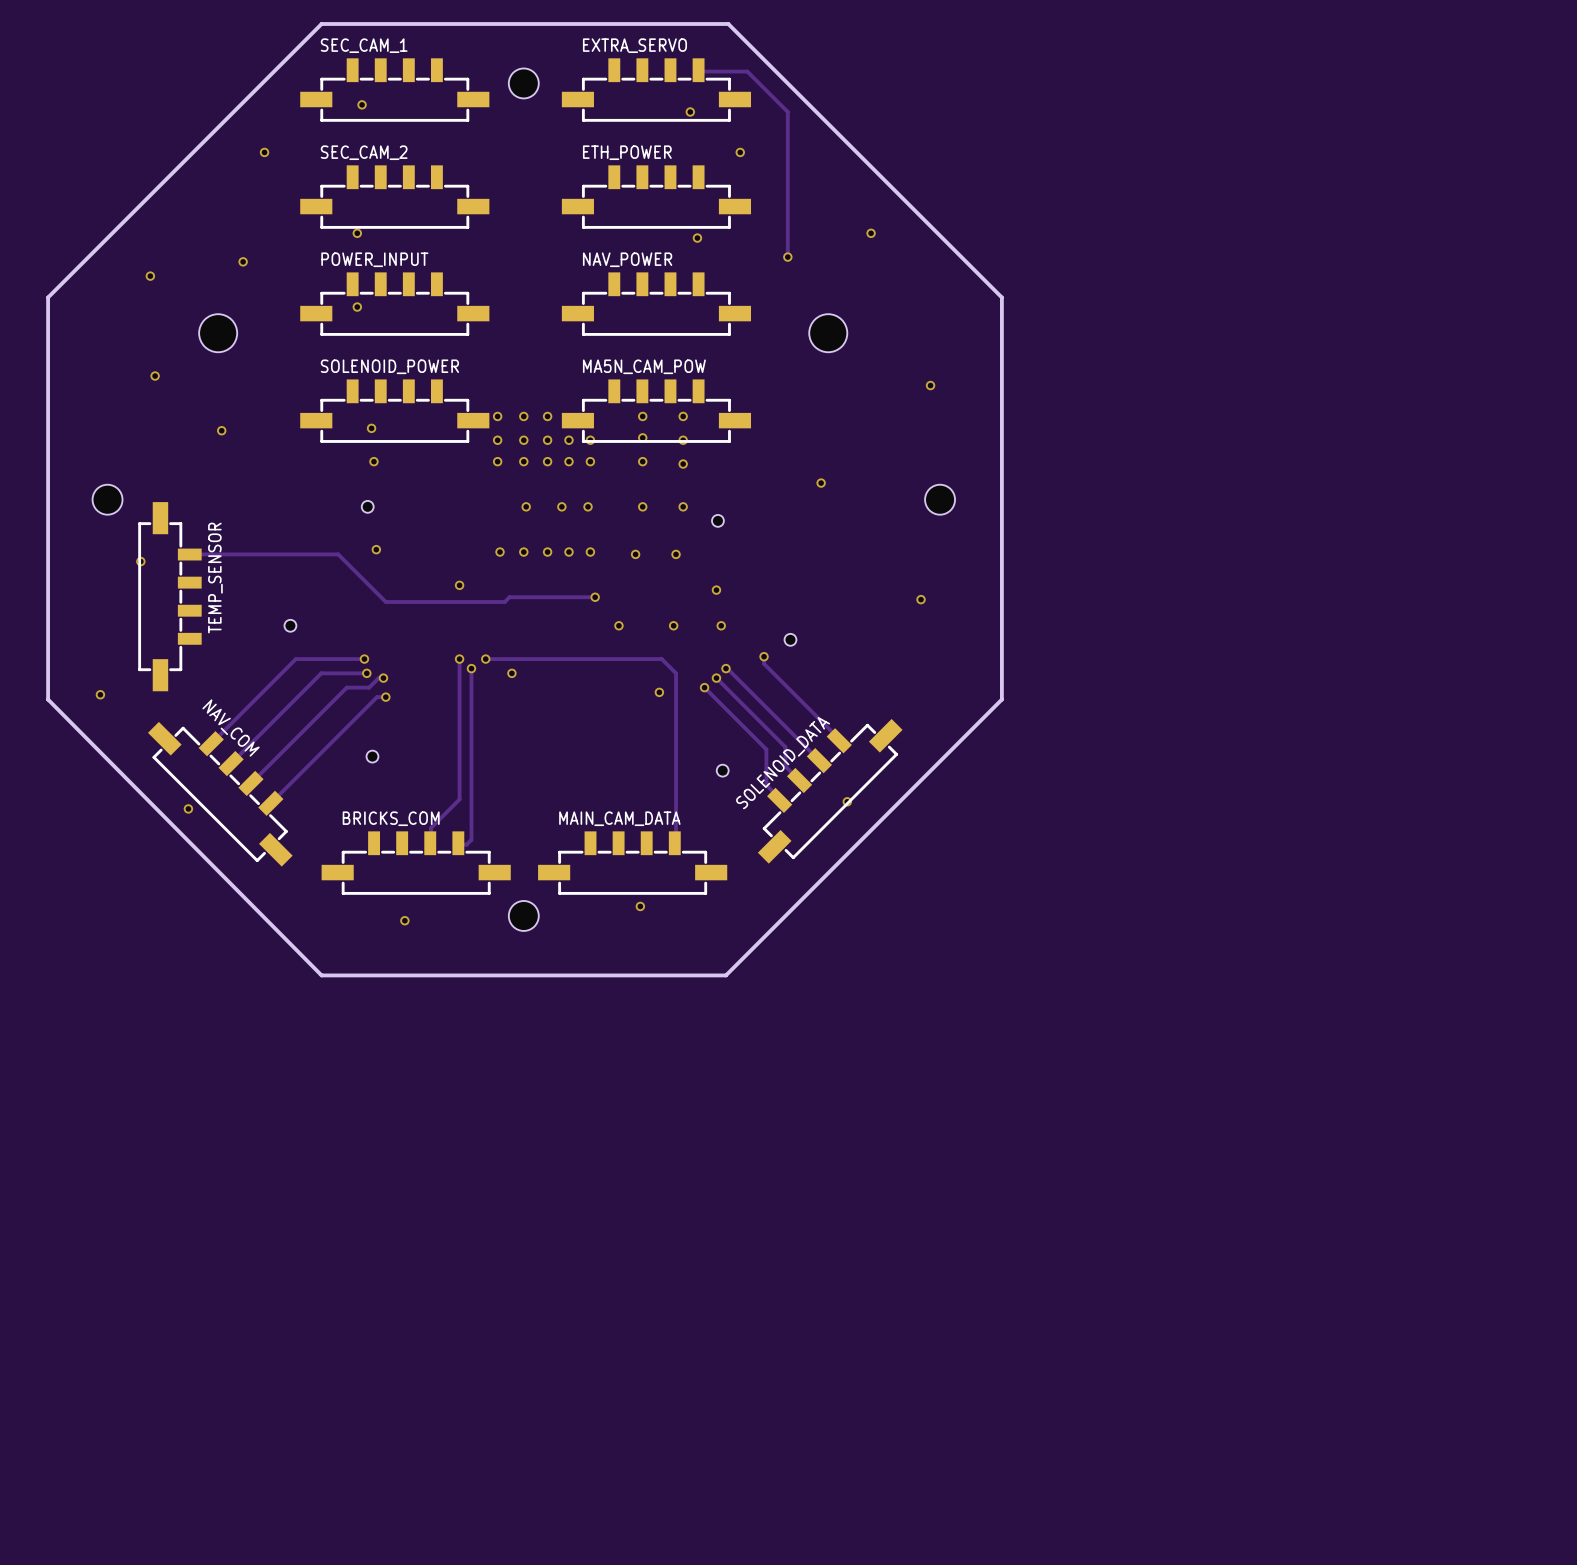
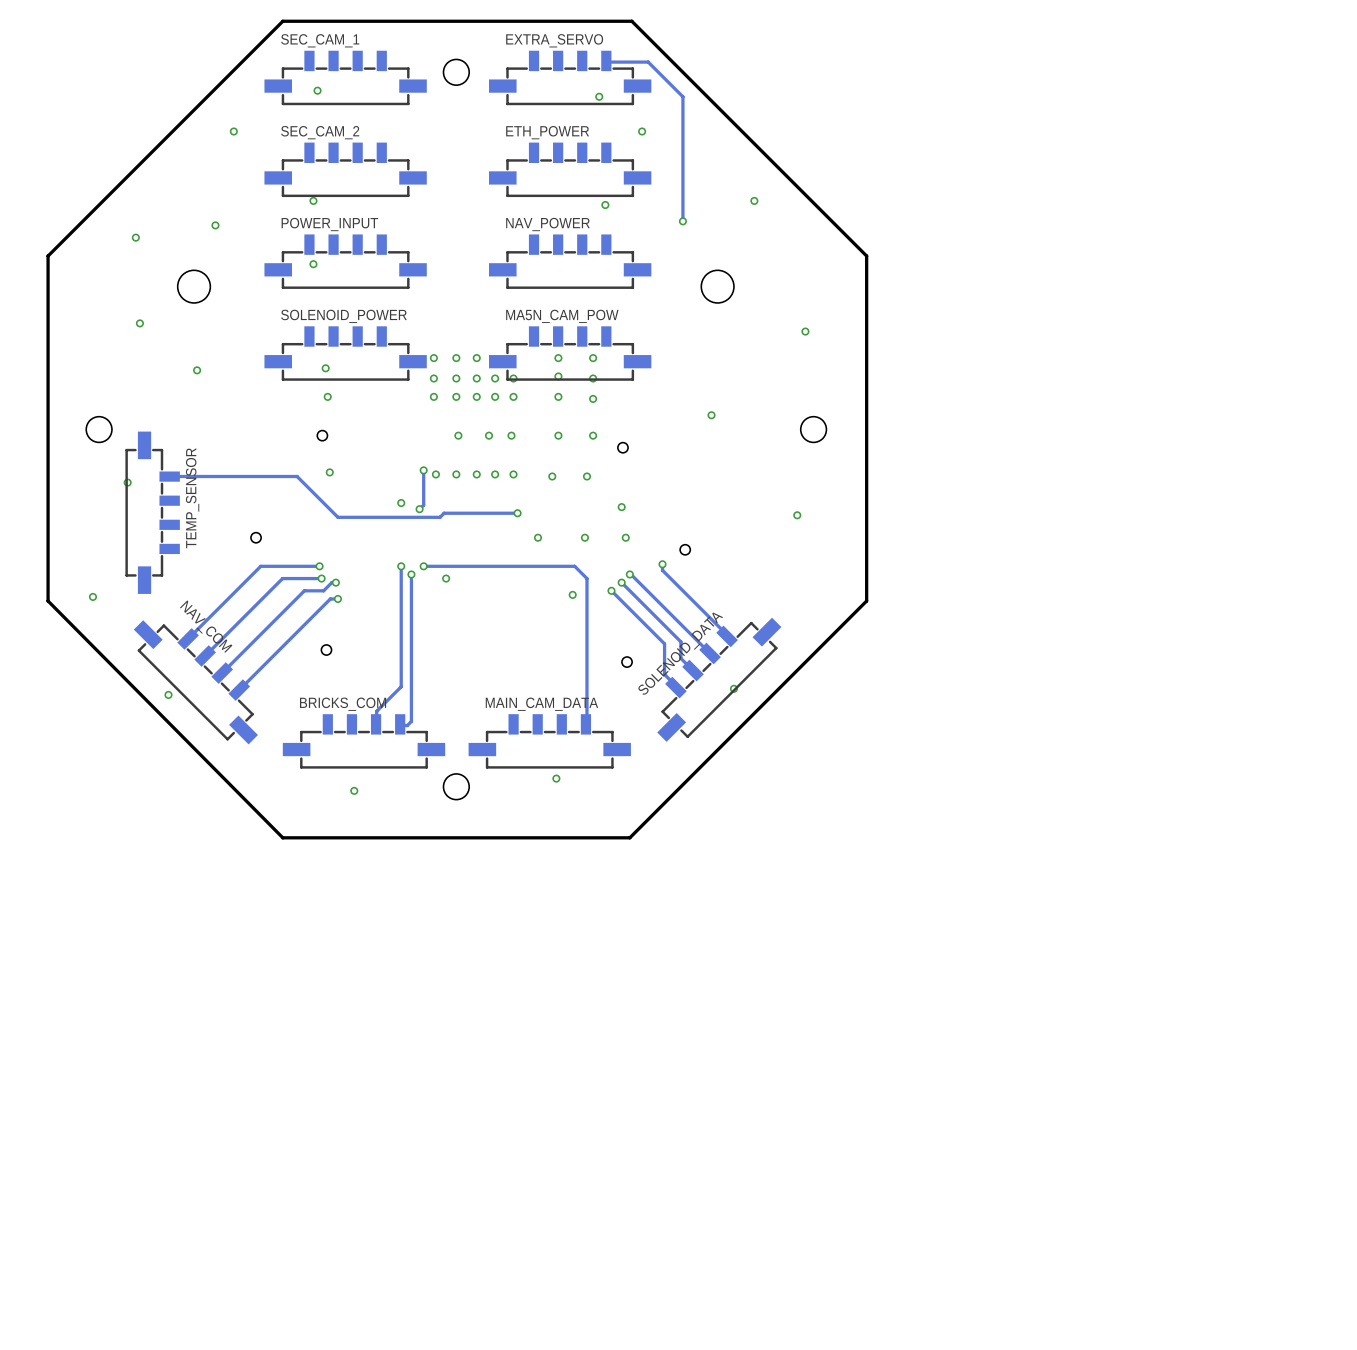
track: none -> (423, 470) (423, 505) (419, 509)
via: none -> (423, 470)
via: none -> (419, 509)

